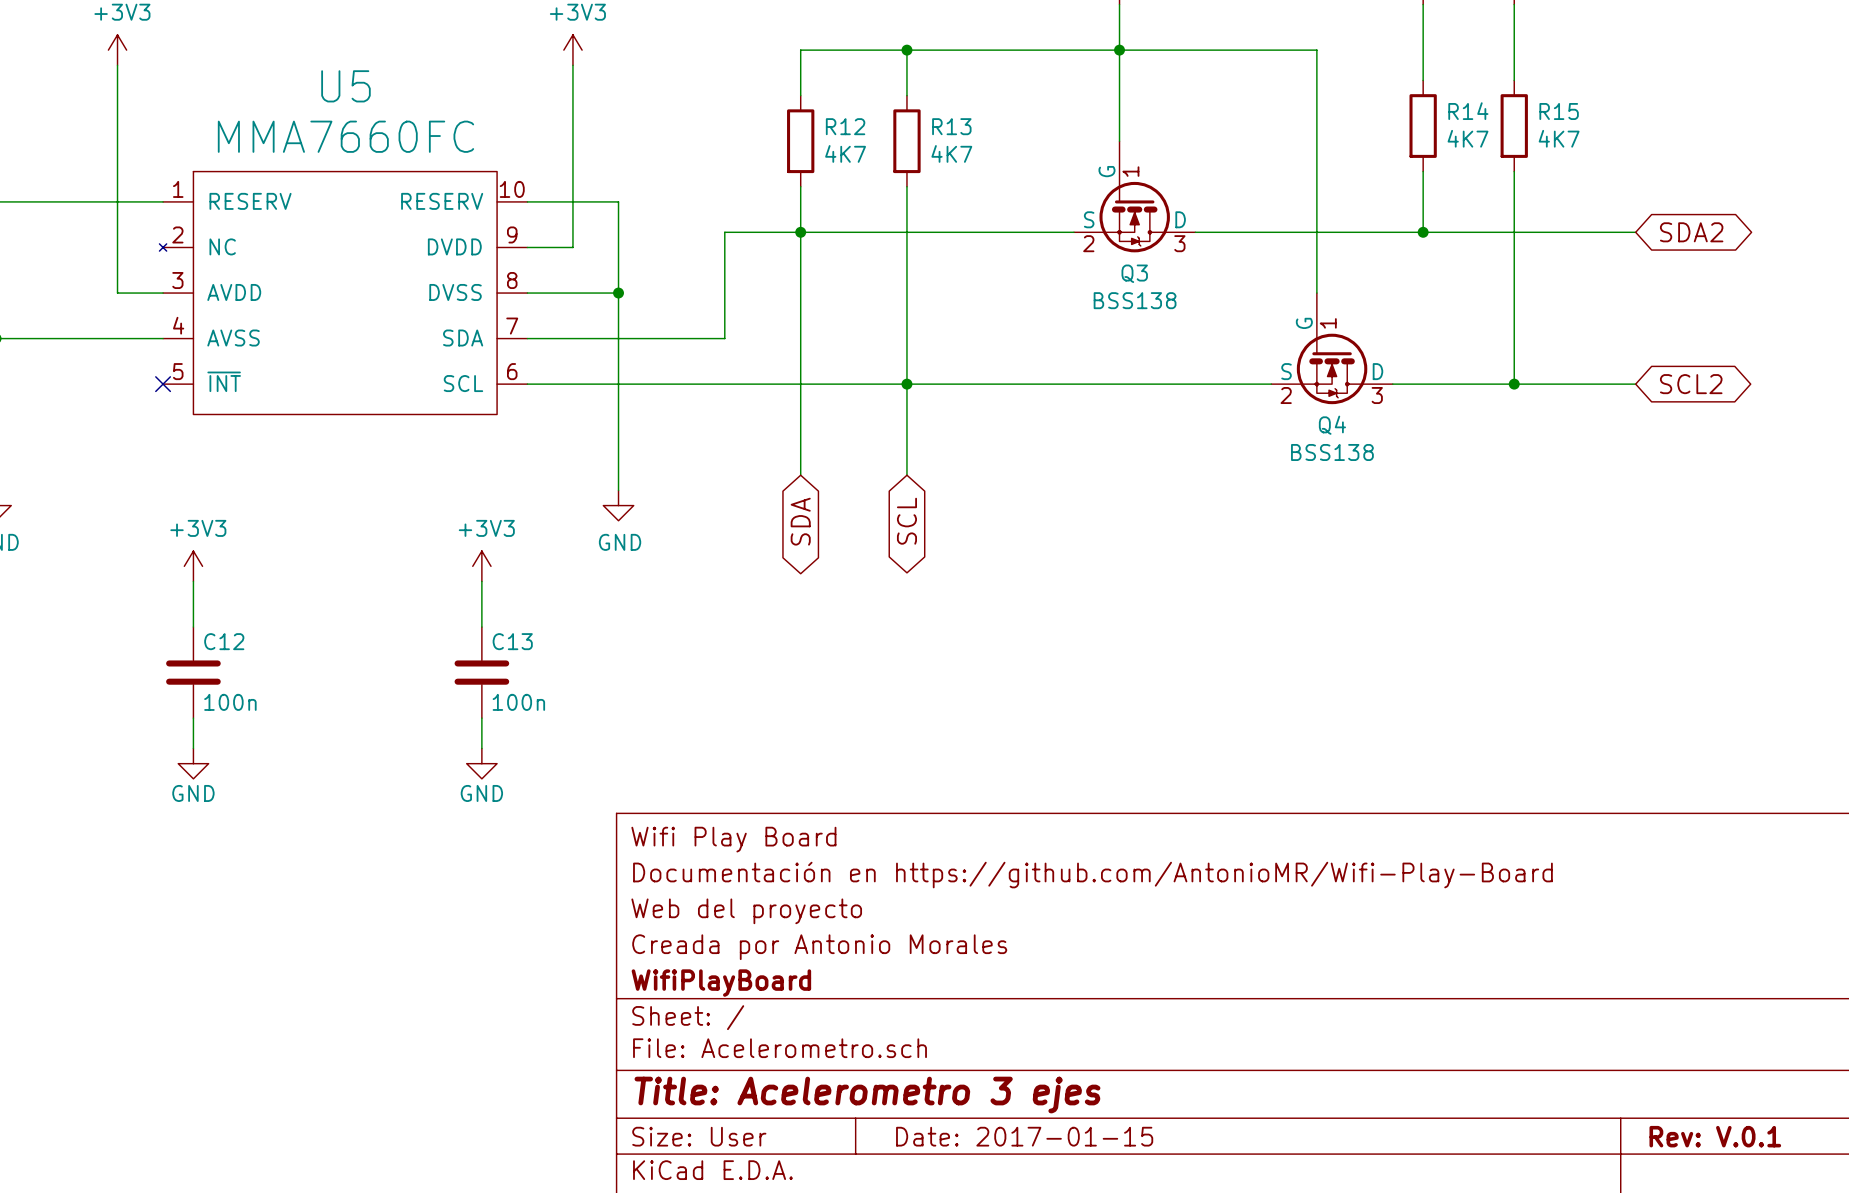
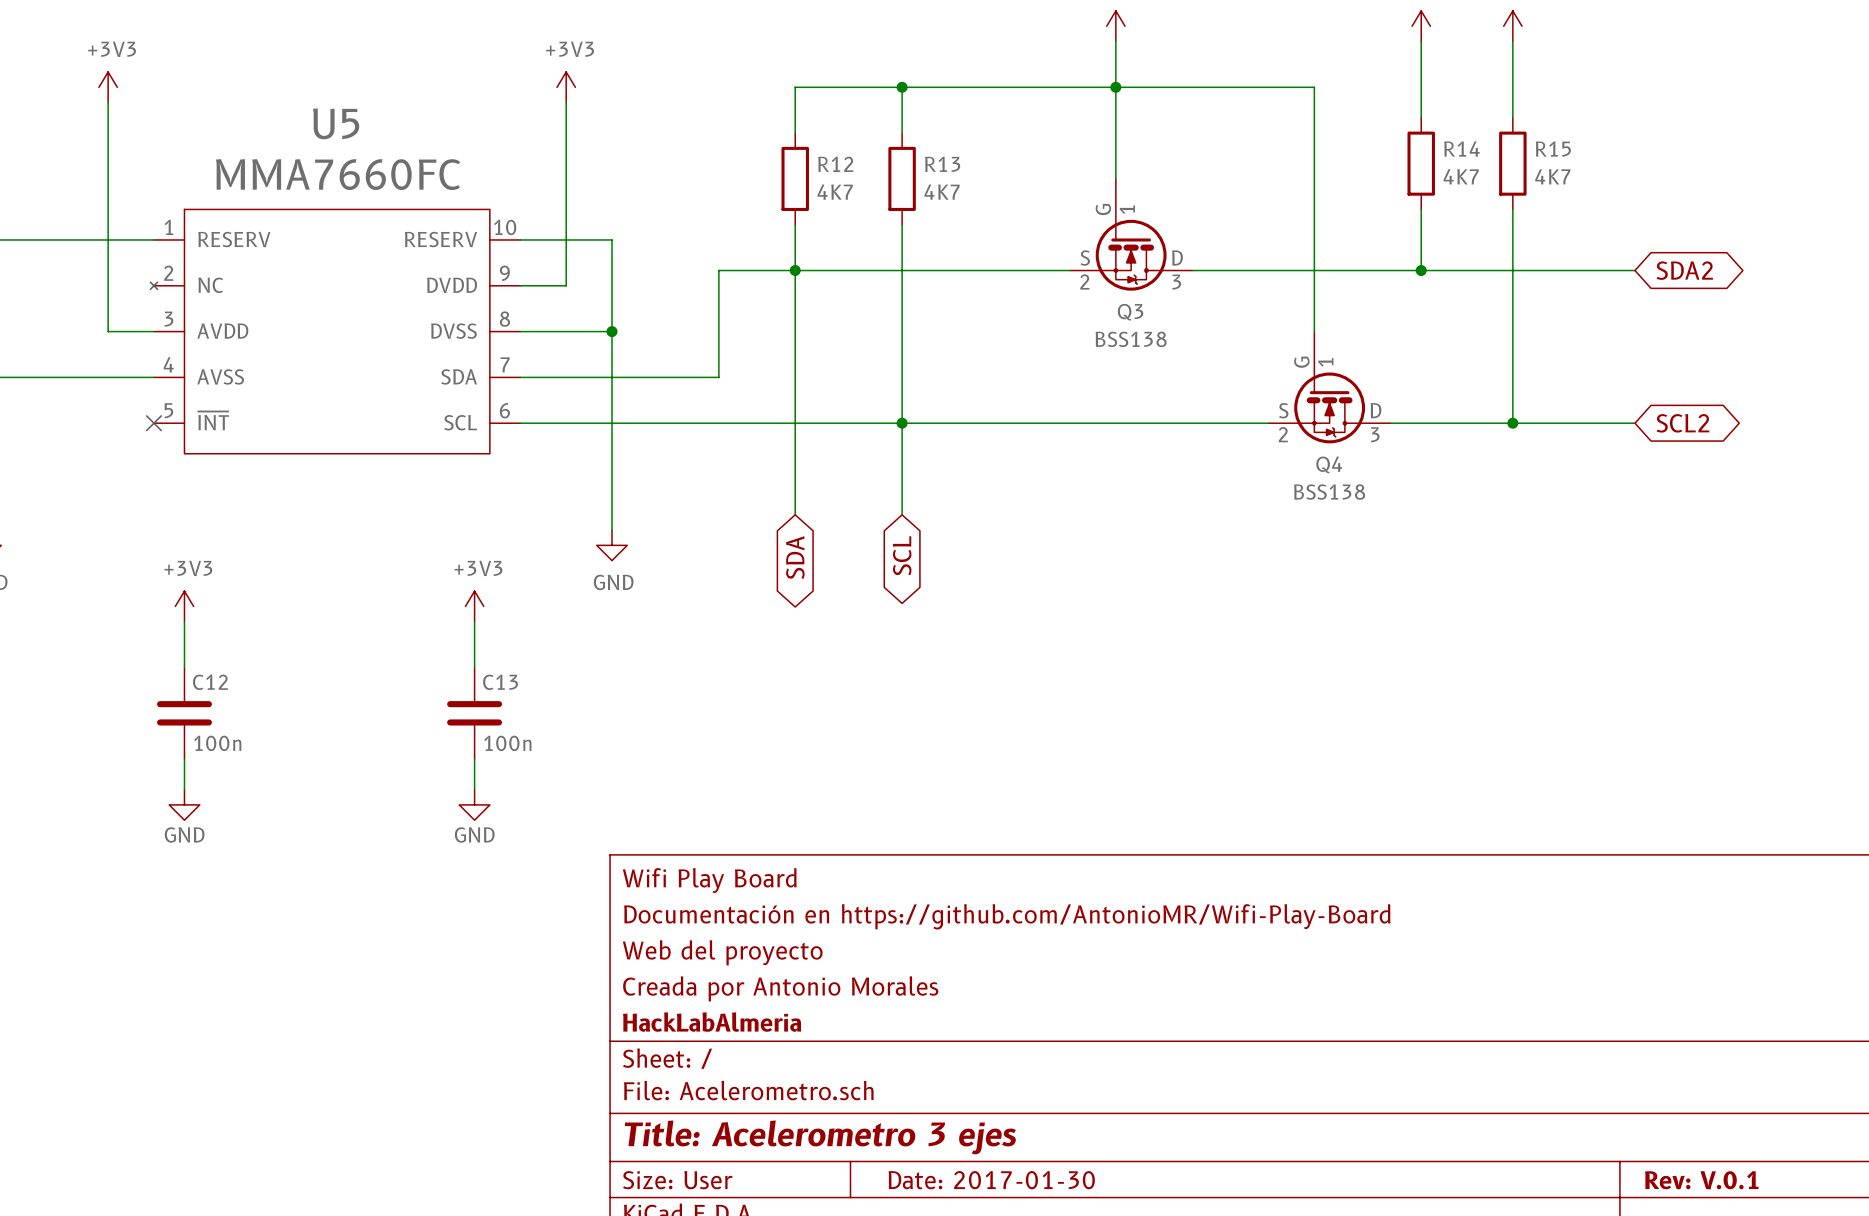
title block: WifiPlayBoard (721, 983) -> HackLabAlmeria (712, 1022)
title block: Date: 2017-01-15 (1024, 1136) -> Date: 2017-01-30 (991, 1180)

